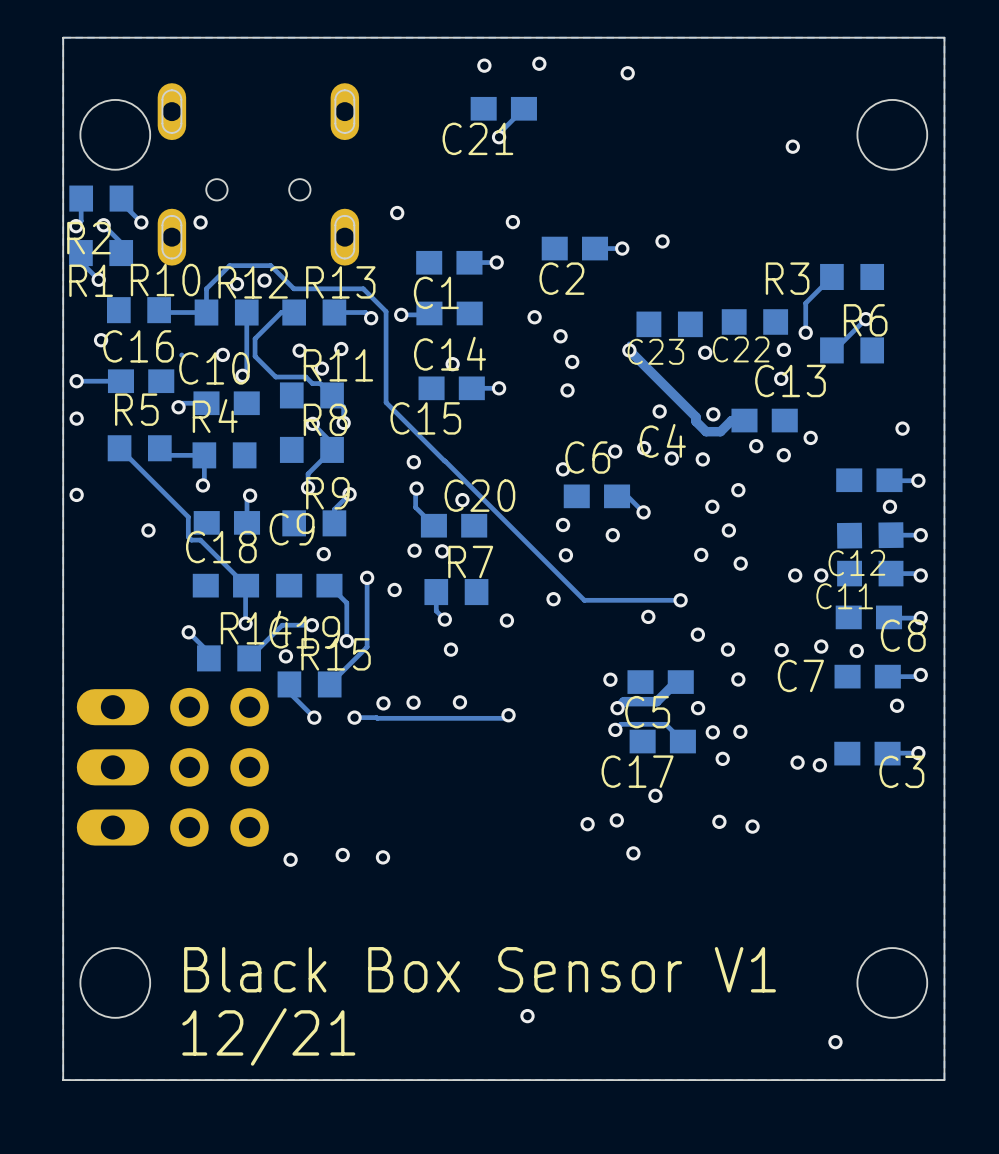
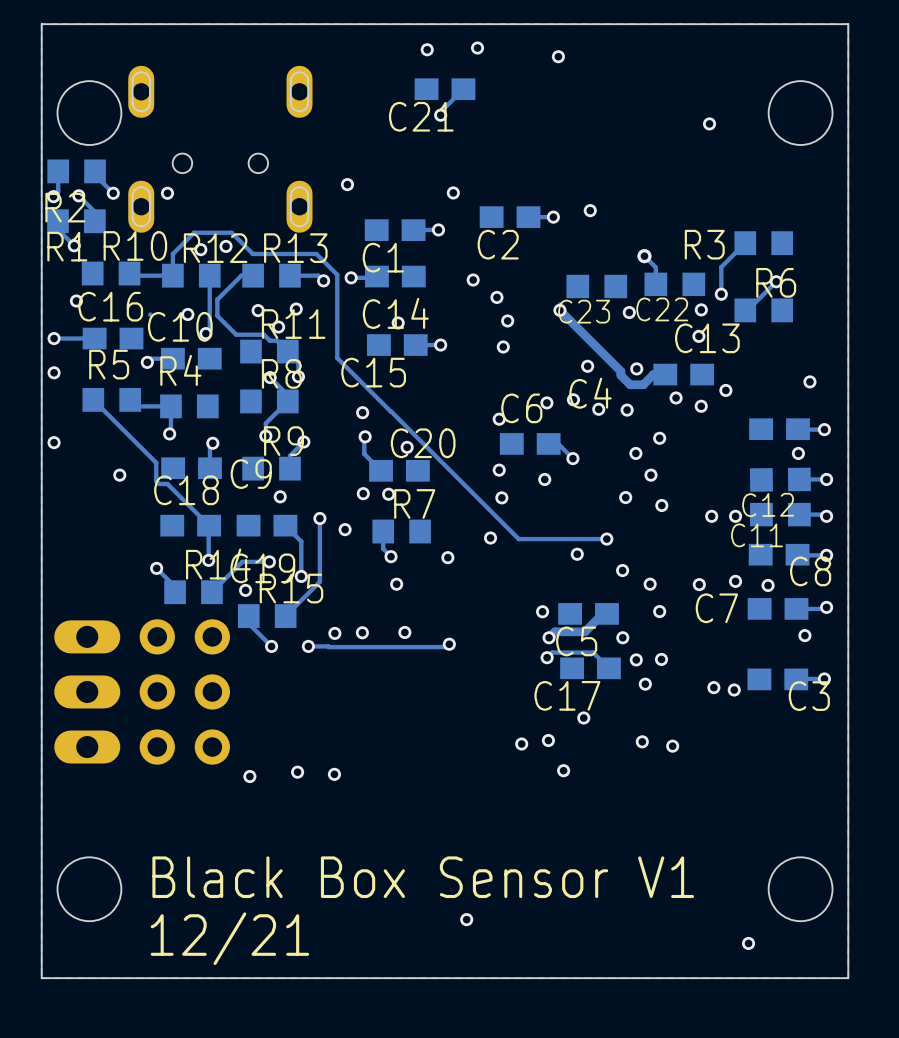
track: none -> (644, 256) (655, 267) (655, 284)
via: none -> (644, 256)

